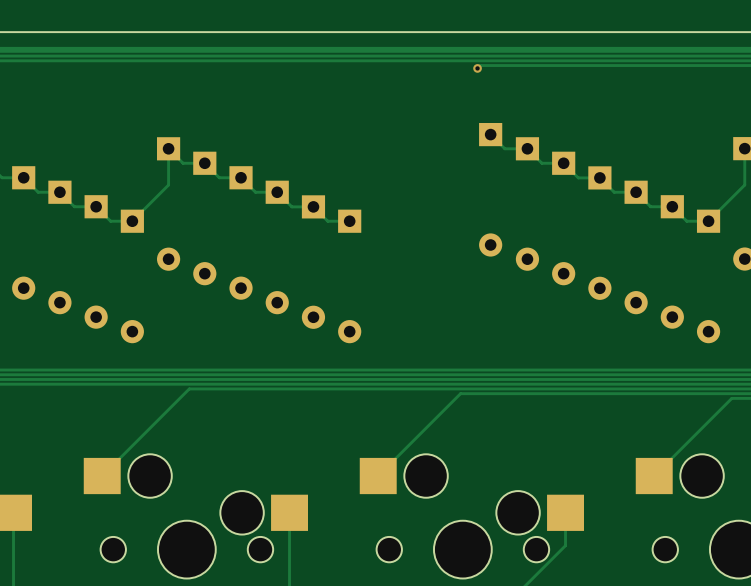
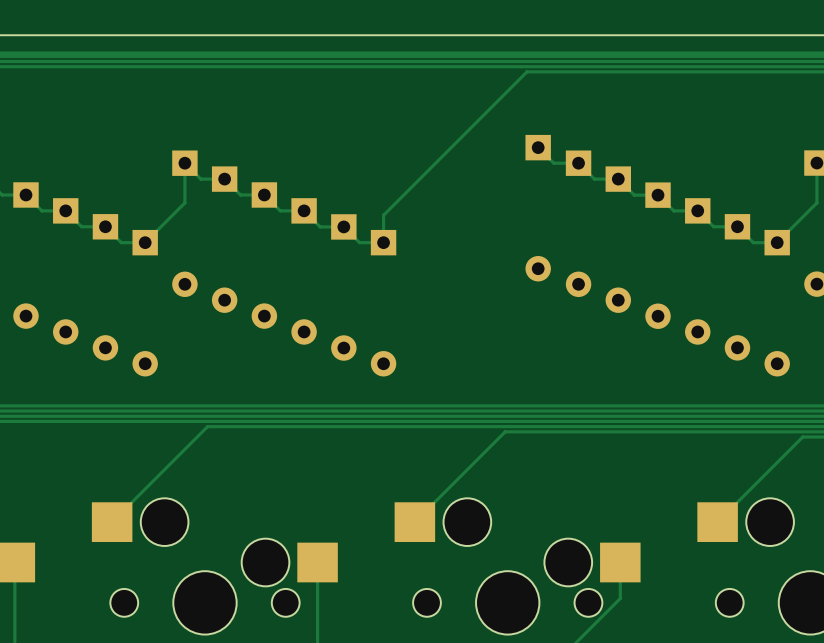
track: none -> (523, 75) (383, 215) (383, 242)
via: (477, 68) -> none

